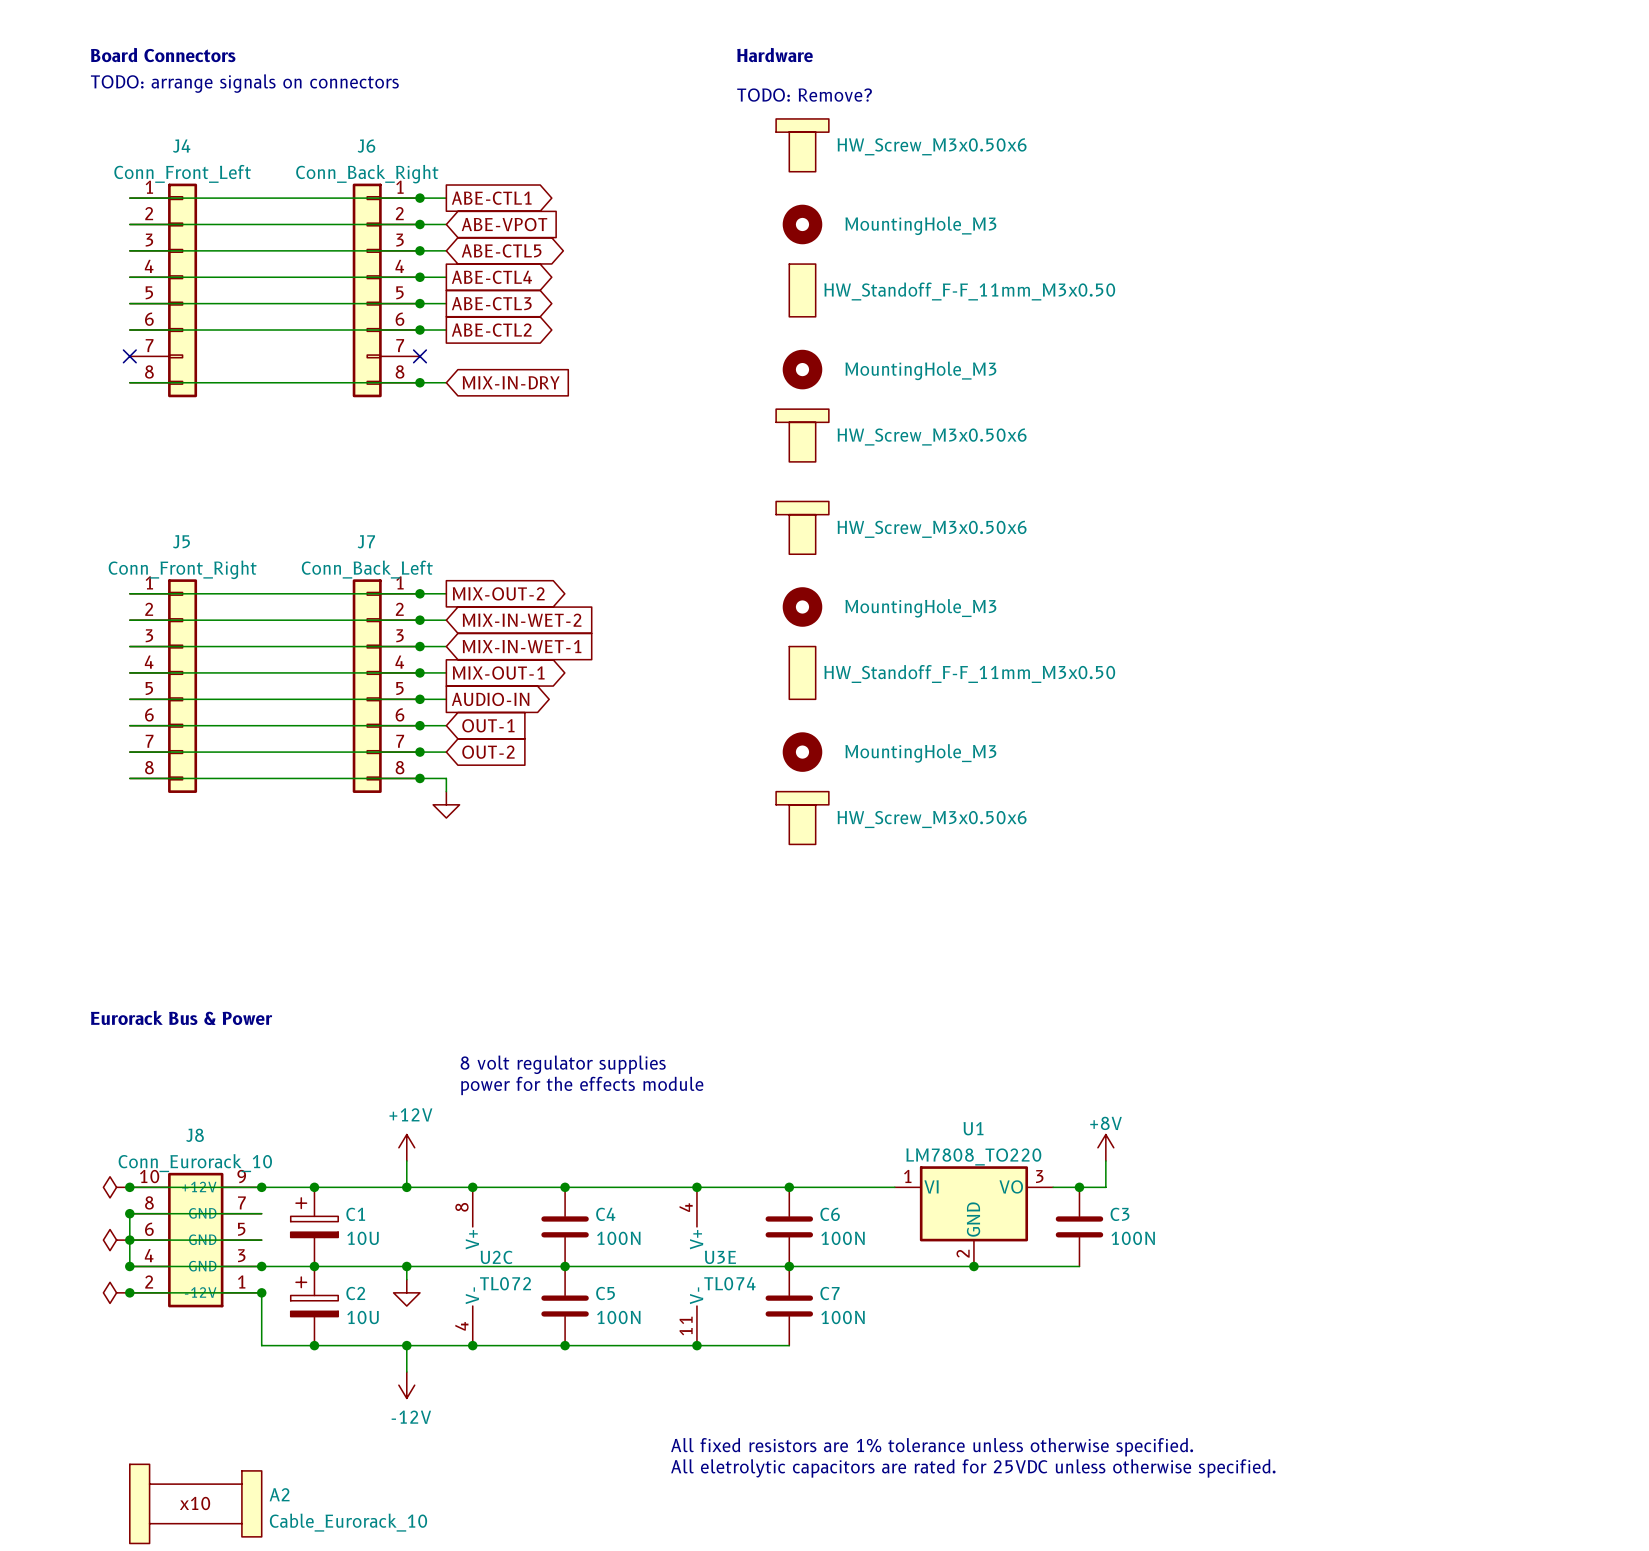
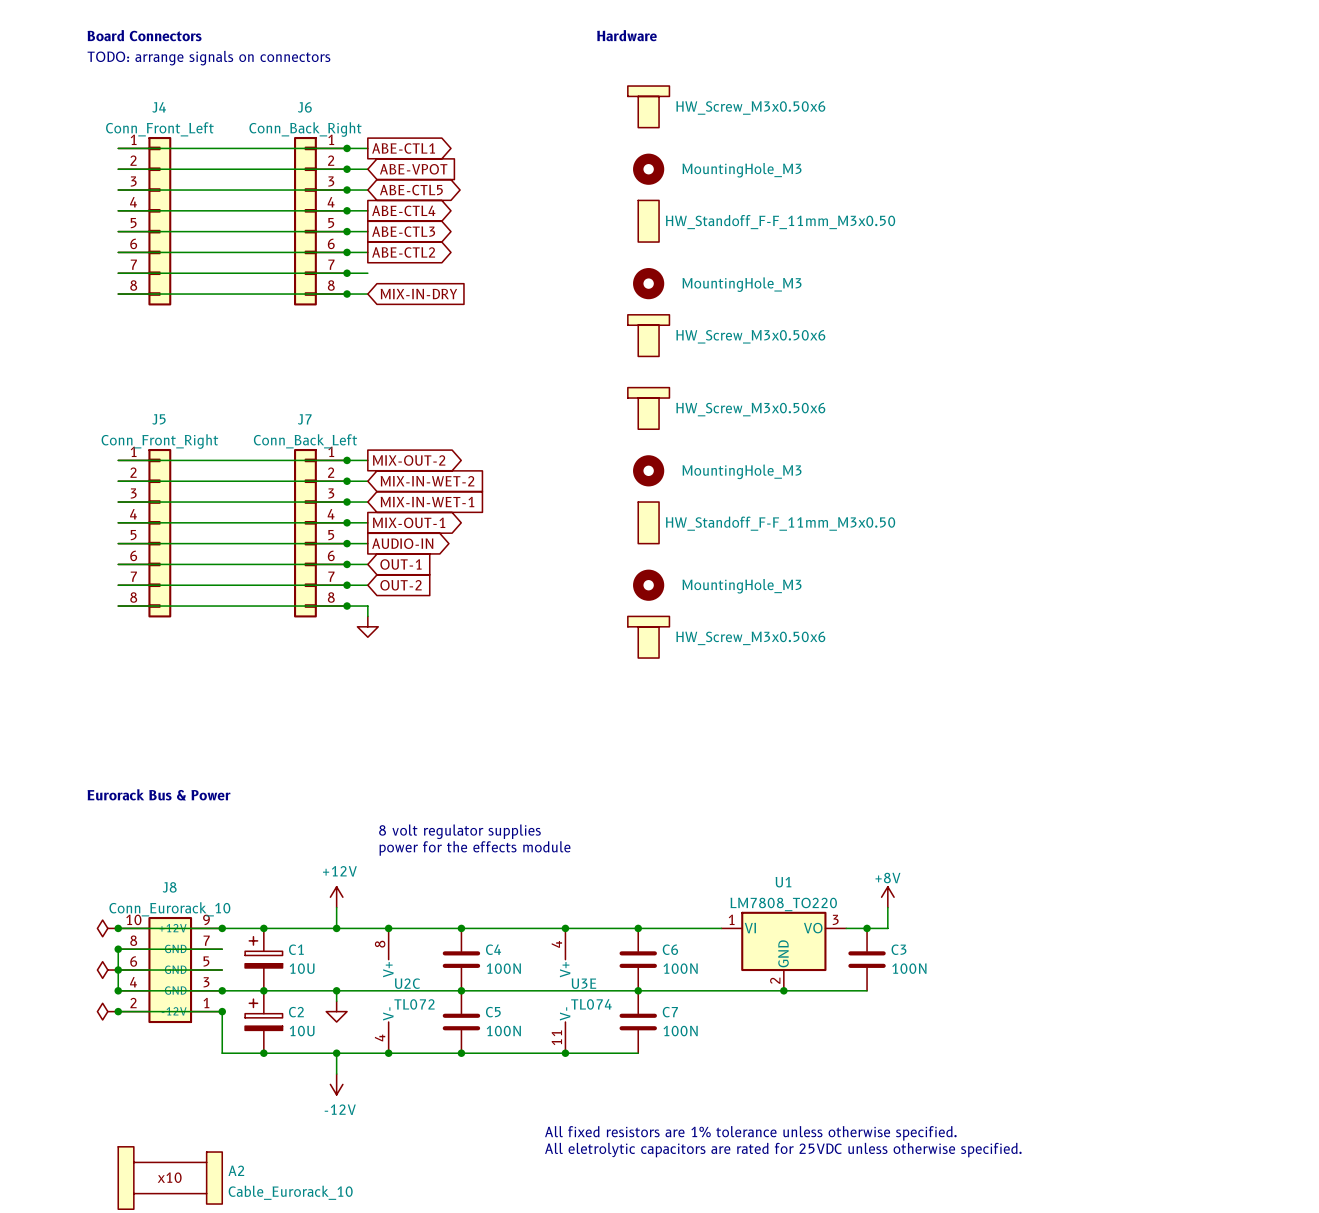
text: TODO: Remove? (804, 95) -> none
wire: none -> (118, 273) (367, 273)
no-connect mark: (129, 356) -> none
no-connect mark: (419, 356) -> none
junction: none -> (347, 273)

